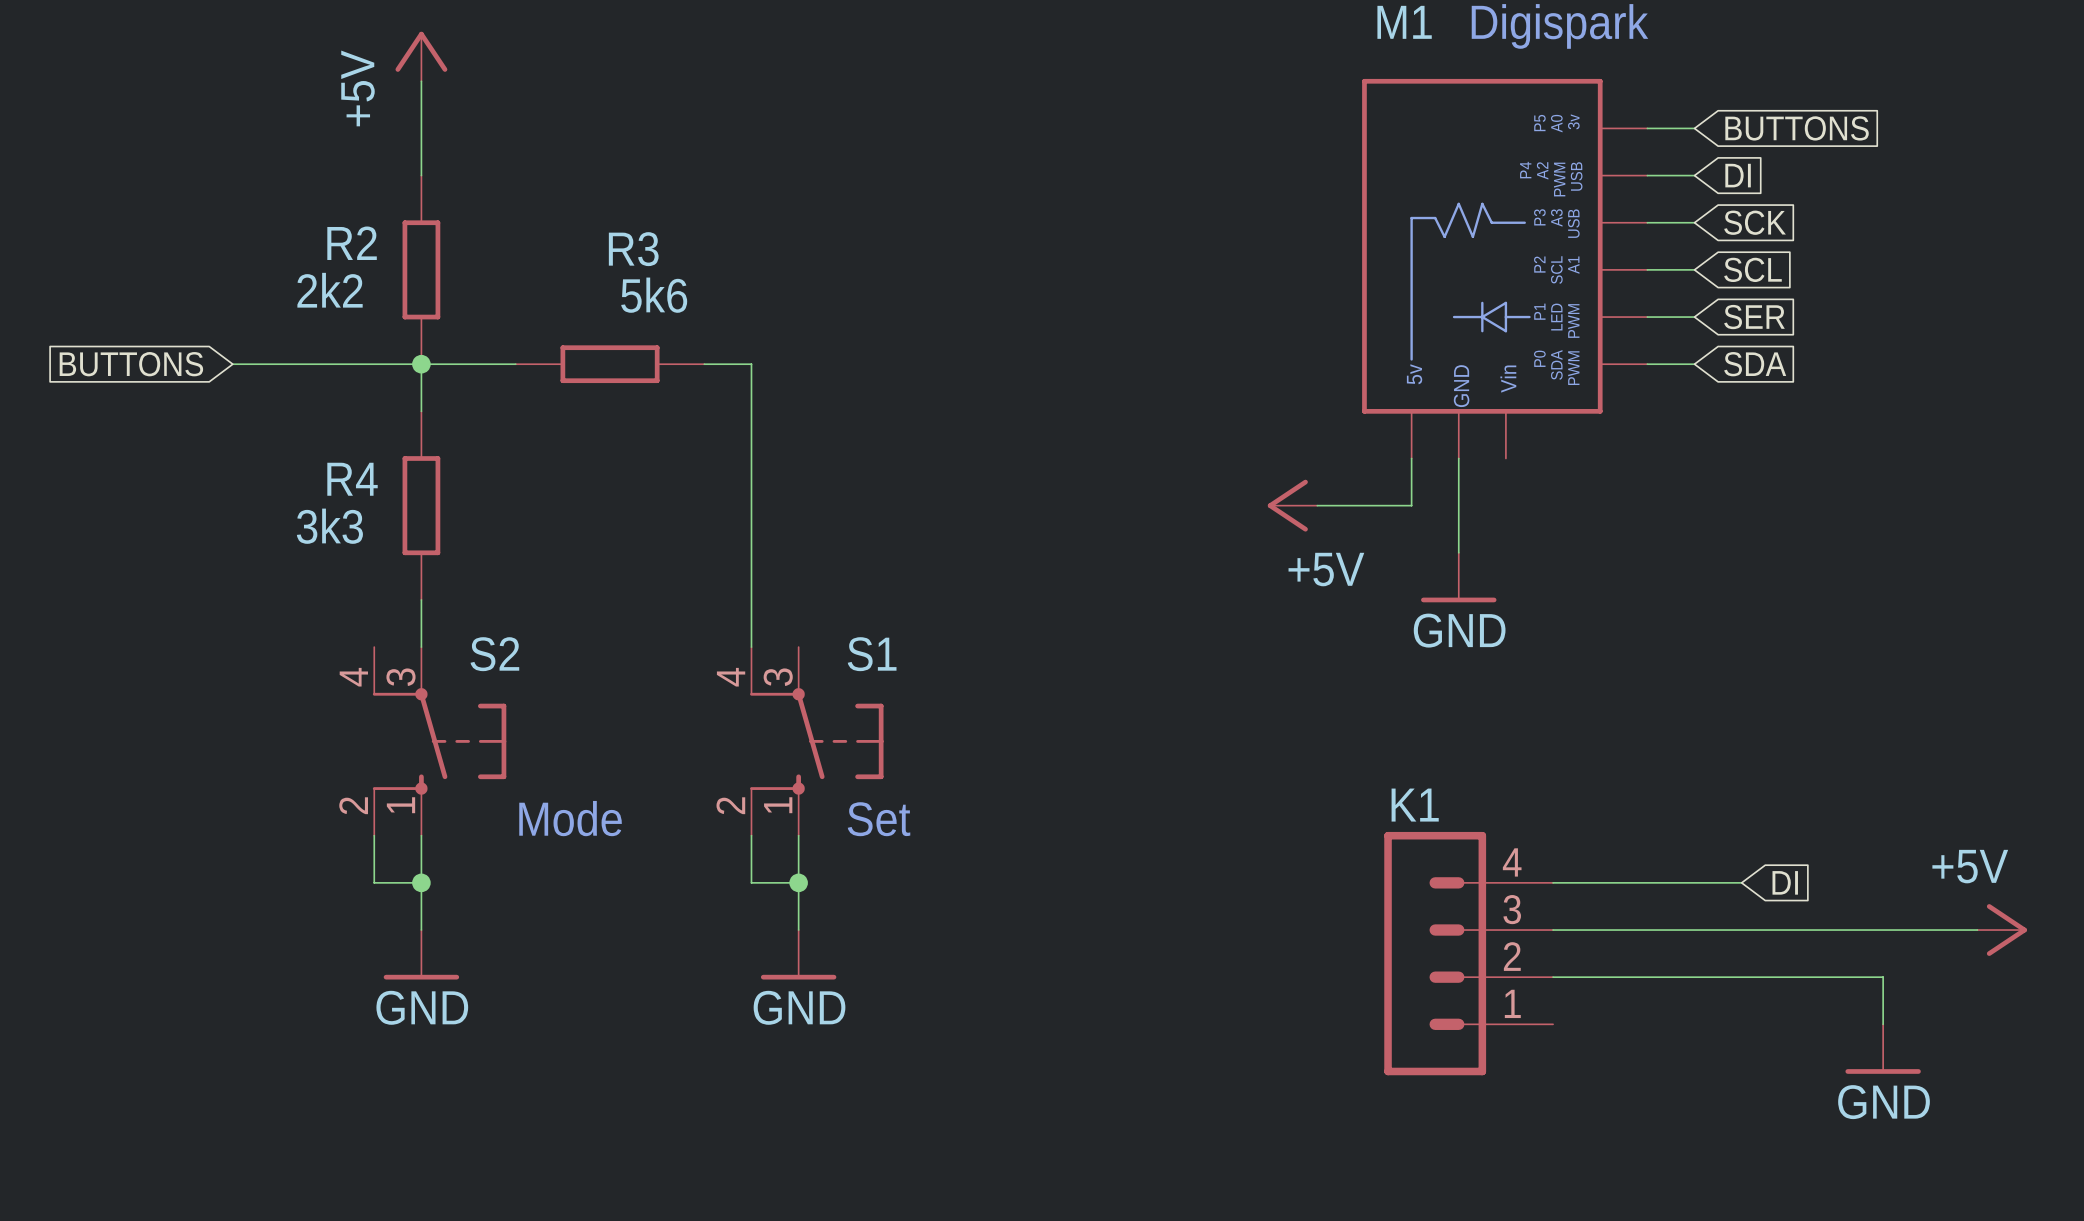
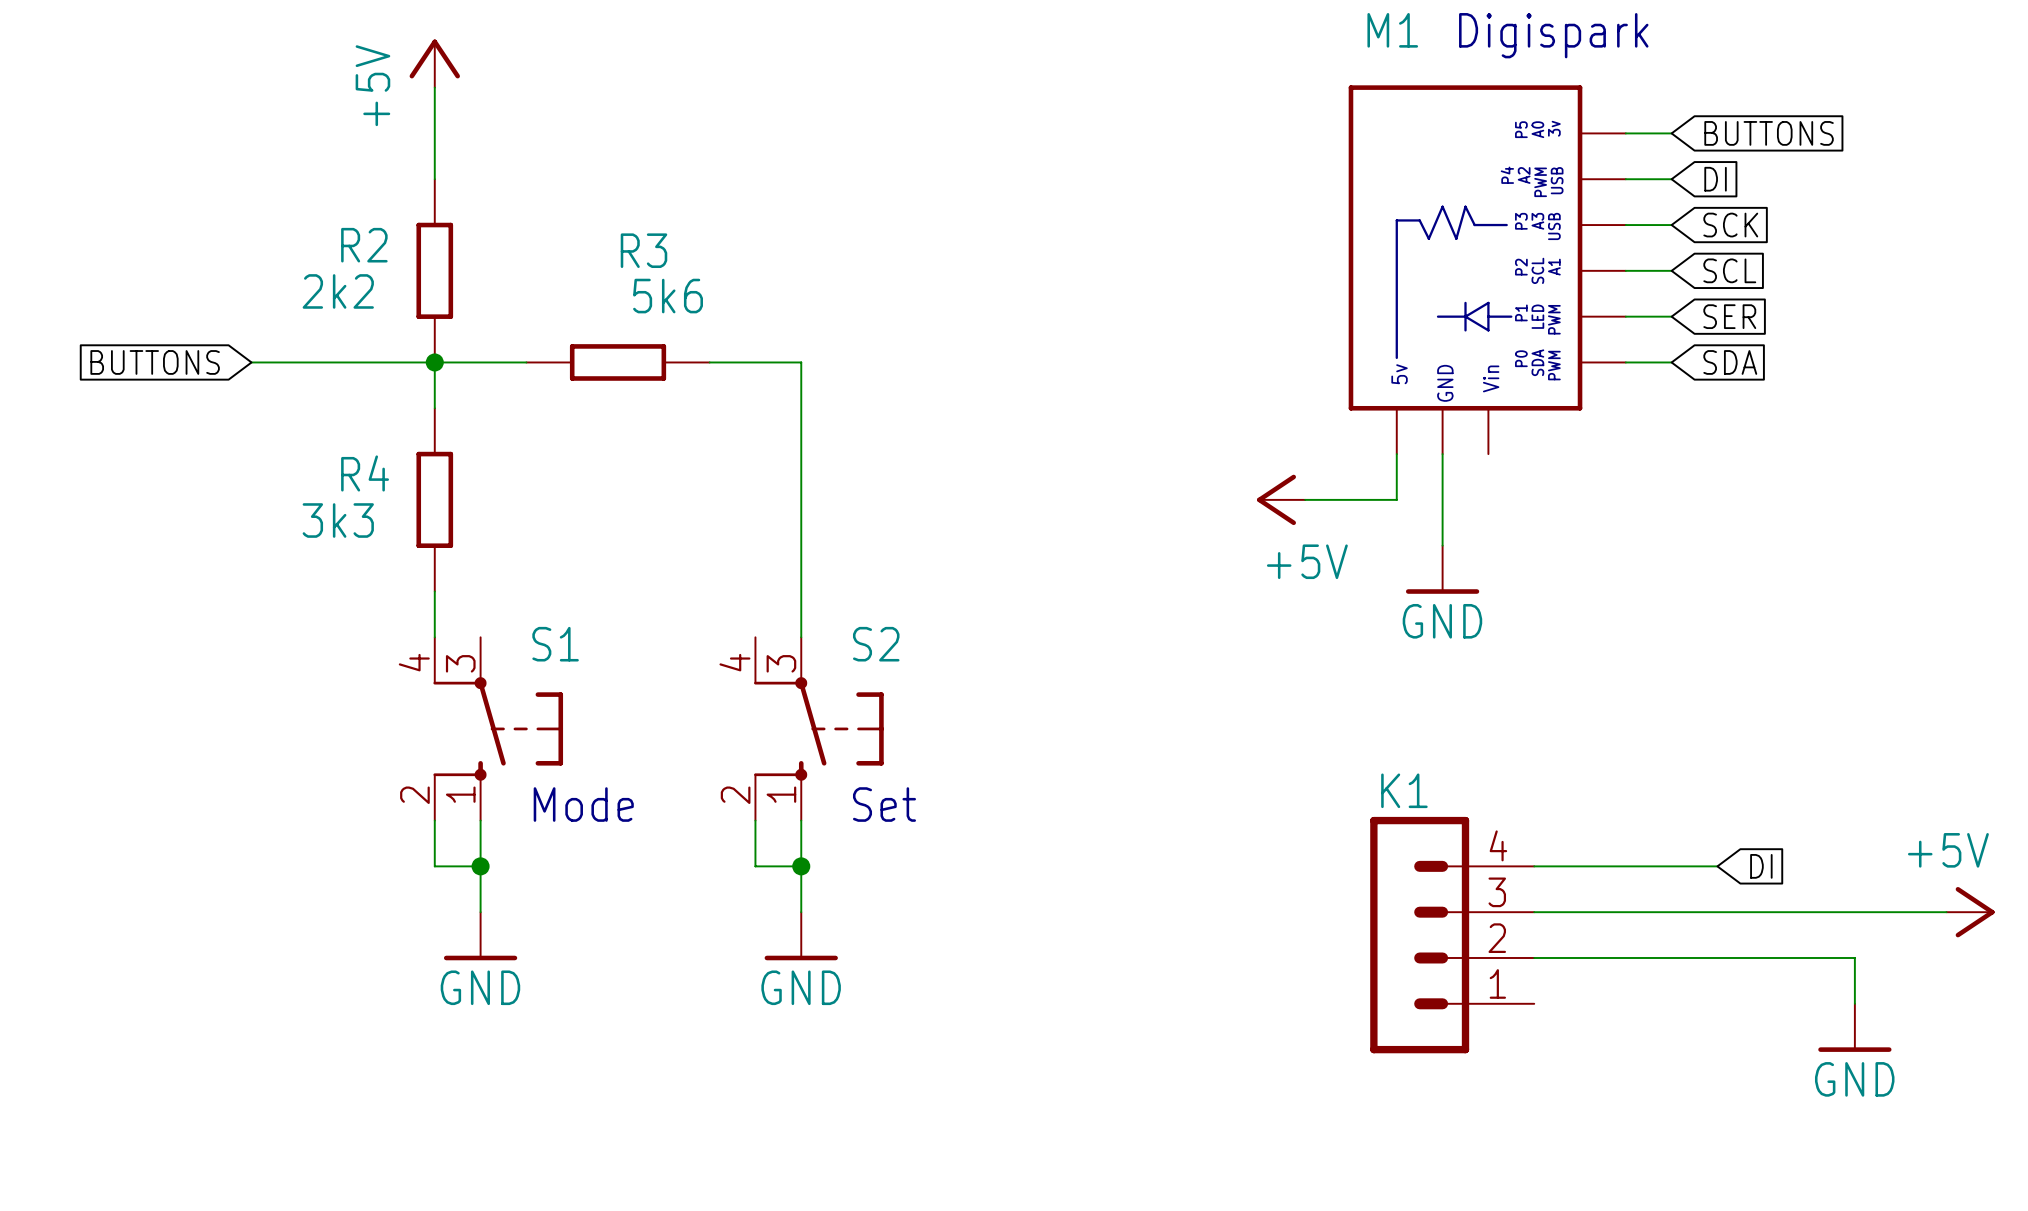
wire: (751, 364) (751, 647) -> (755, 362) (801, 362) (801, 637)
S1 name: S1 (872, 654) -> S2 (876, 644)
S2: (439, 741) -> none
S1: none -> (498, 728)
wire: (374, 835) (374, 882) (421, 882) (421, 930) -> none
wire: none -> (480, 820) (480, 912)
wire: none -> (434, 866) (480, 866)
junction position: (421, 882) -> (480, 866)
power symbol position: GND (421, 954) -> GND (480, 936)

